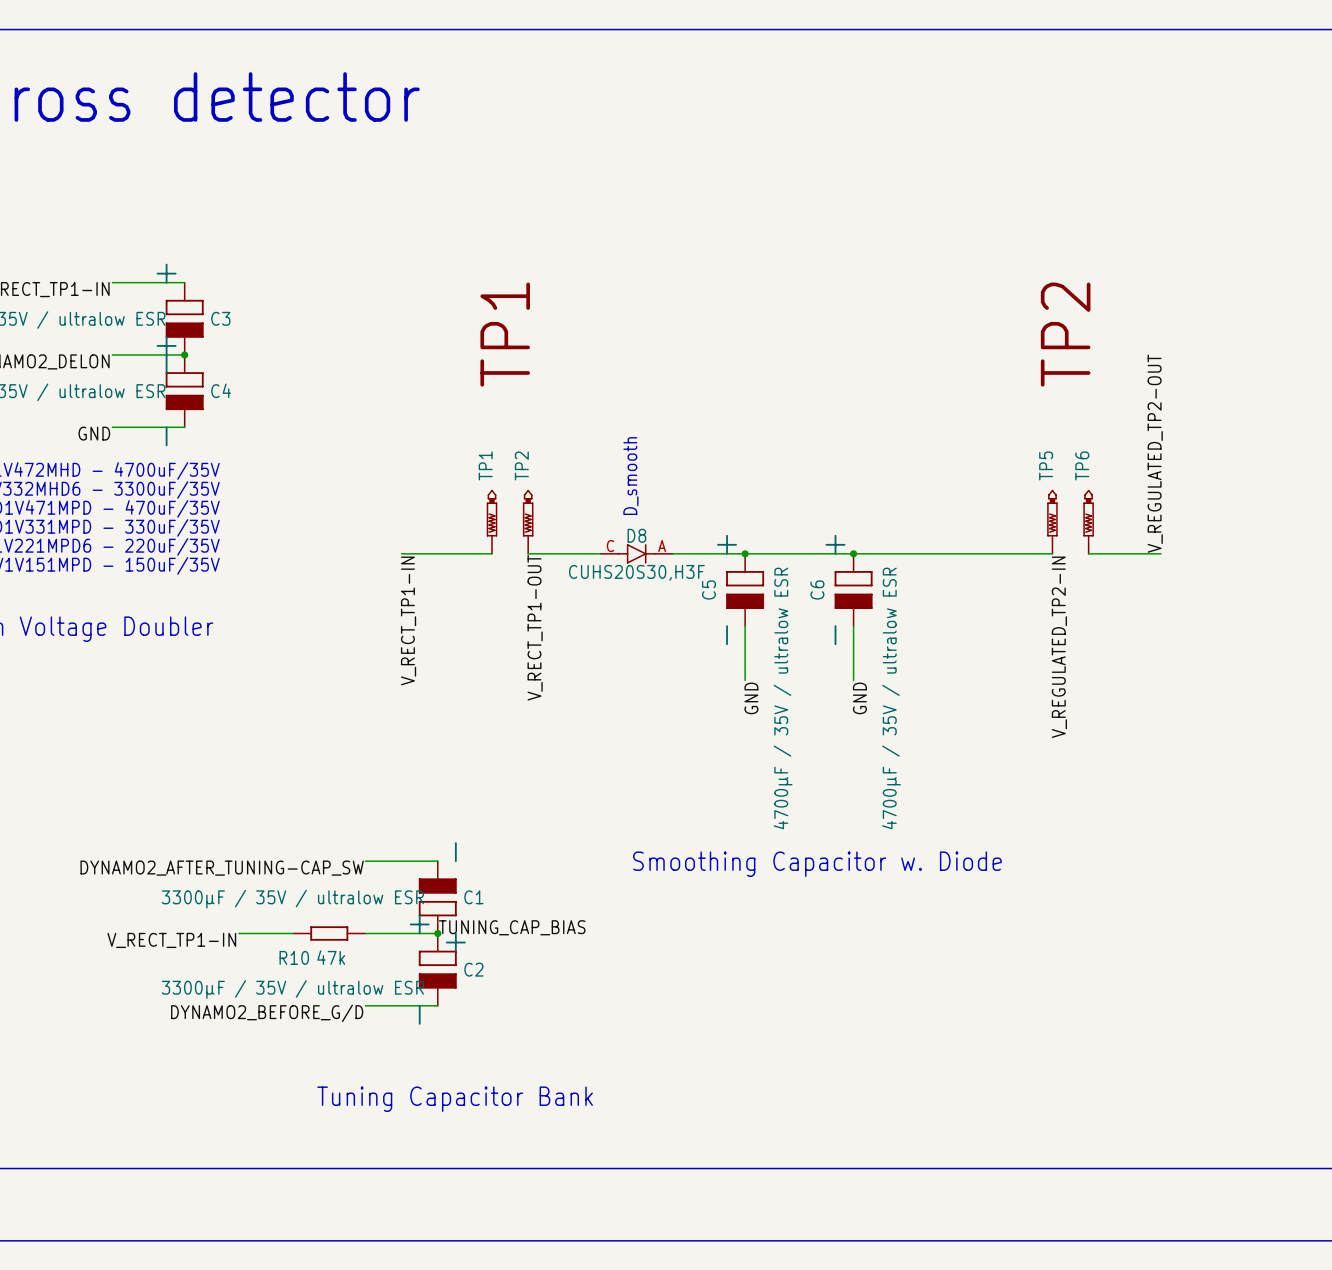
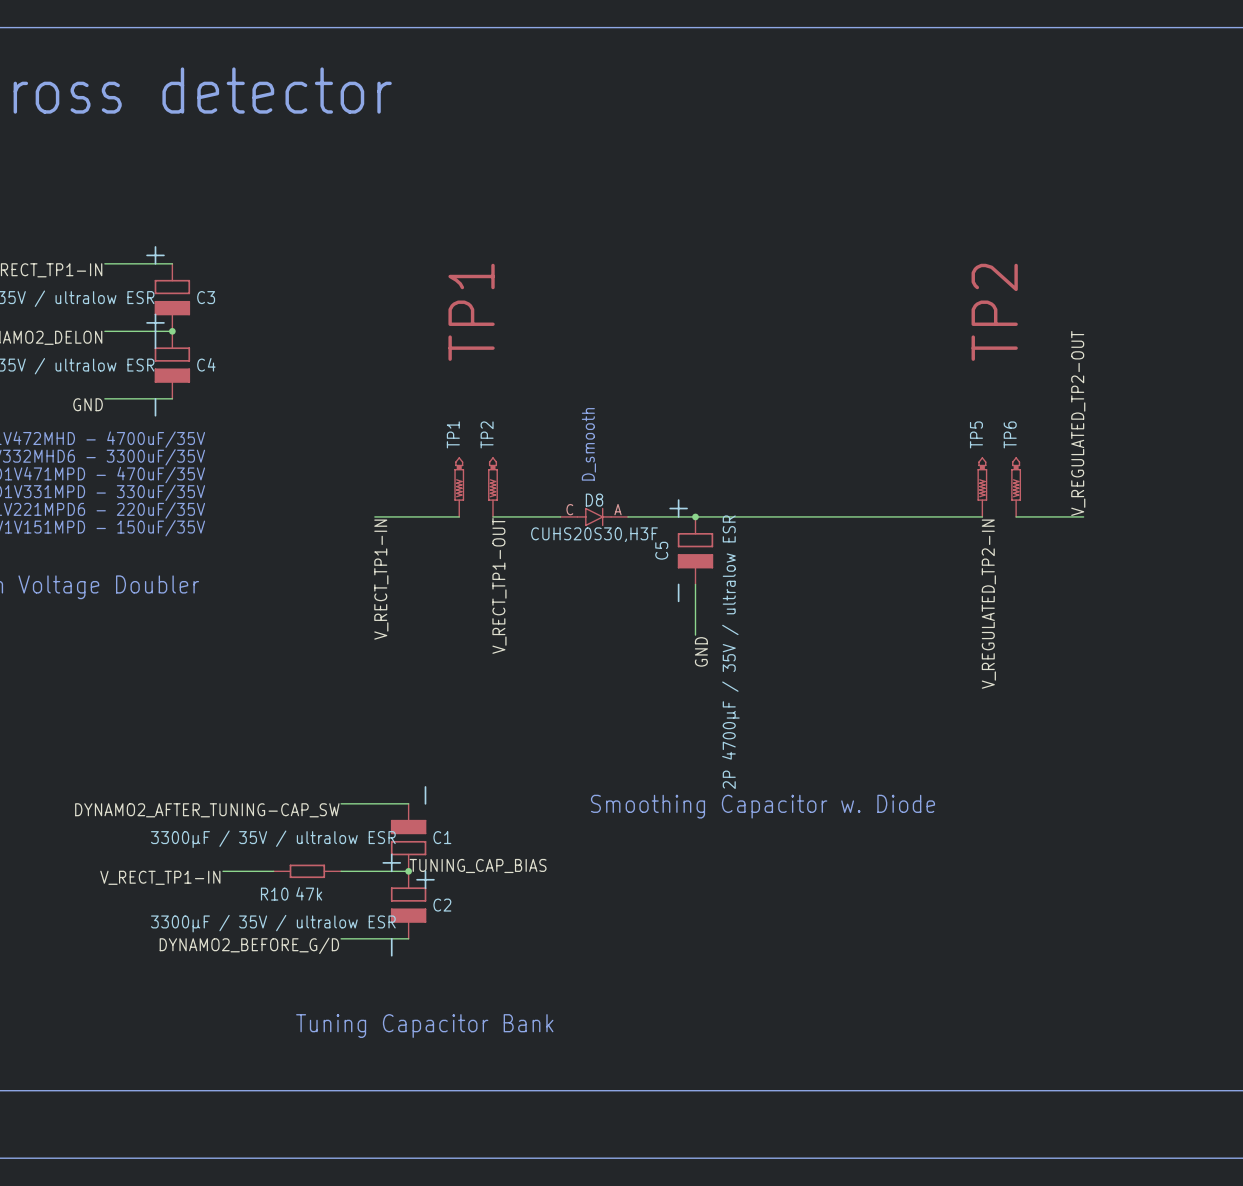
junction: (853, 553) -> none
C6: 4700μF / 35V / ultralow ESR (849, 590) -> none
wire: (853, 626) (853, 680) -> none
C5 value: 4700μF / 35V / ultralow ESR (783, 698) -> 2P 4700μF / 35V / ultralow ESR (730, 652)
label: GND (859, 698) -> none

